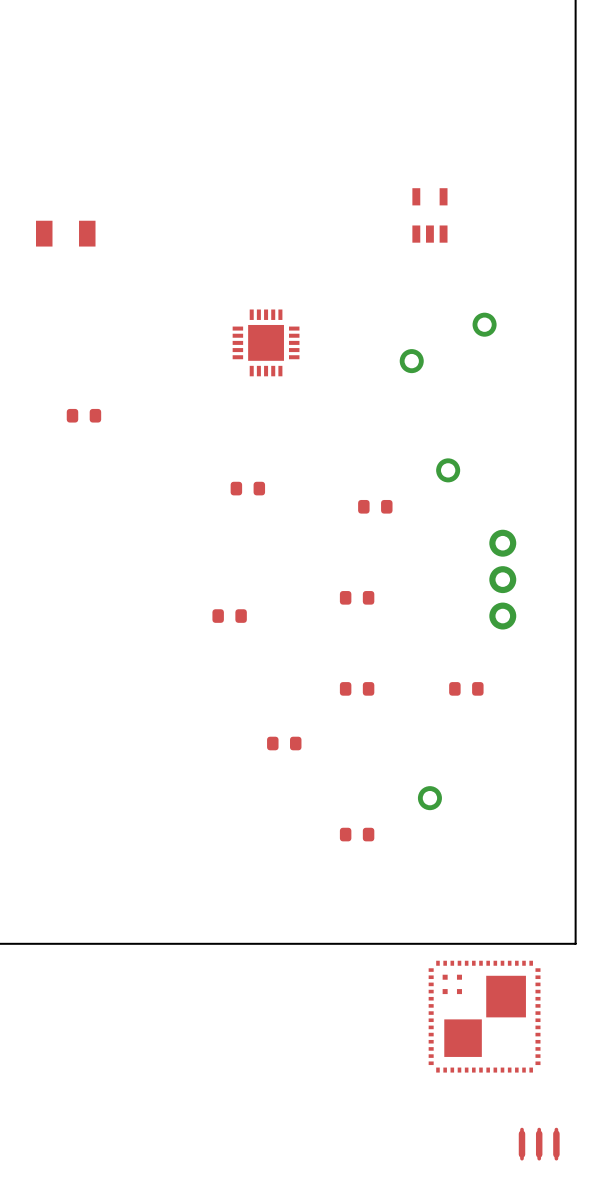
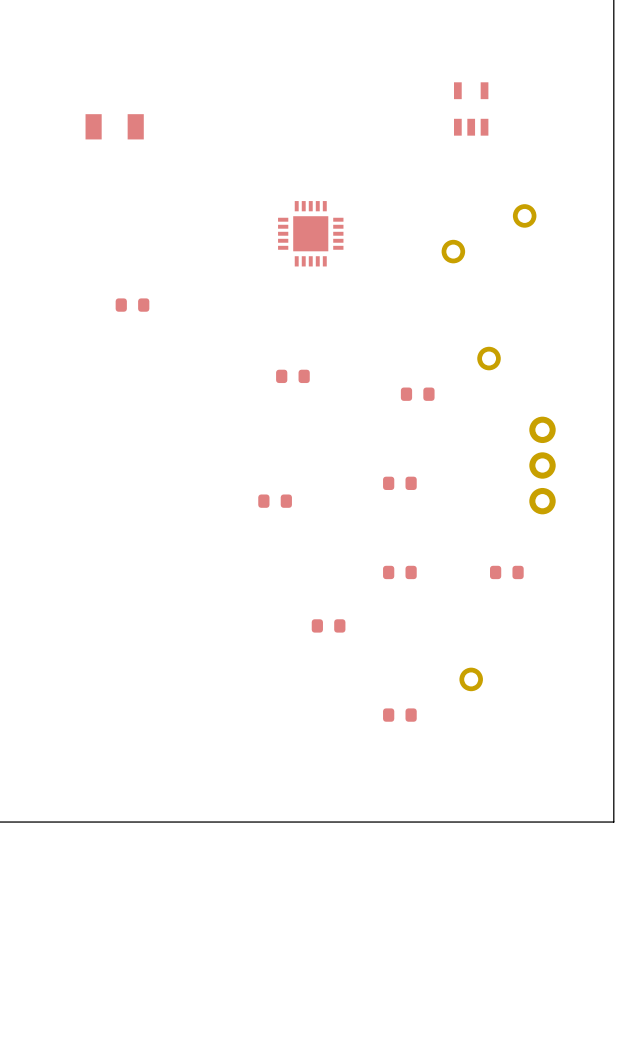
part: (484, 1016) -> none
part: (539, 1144) -> none

